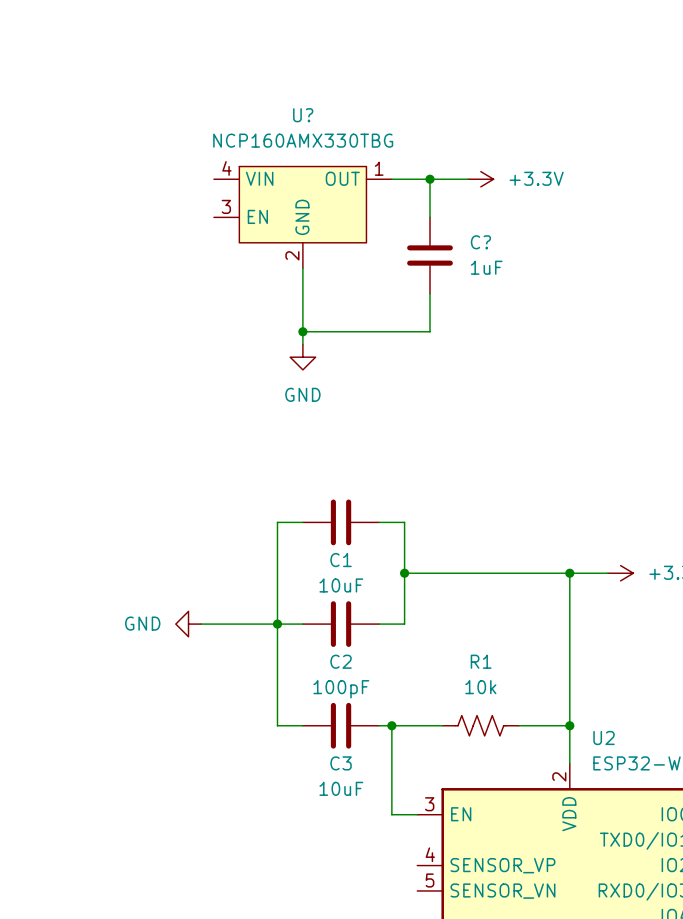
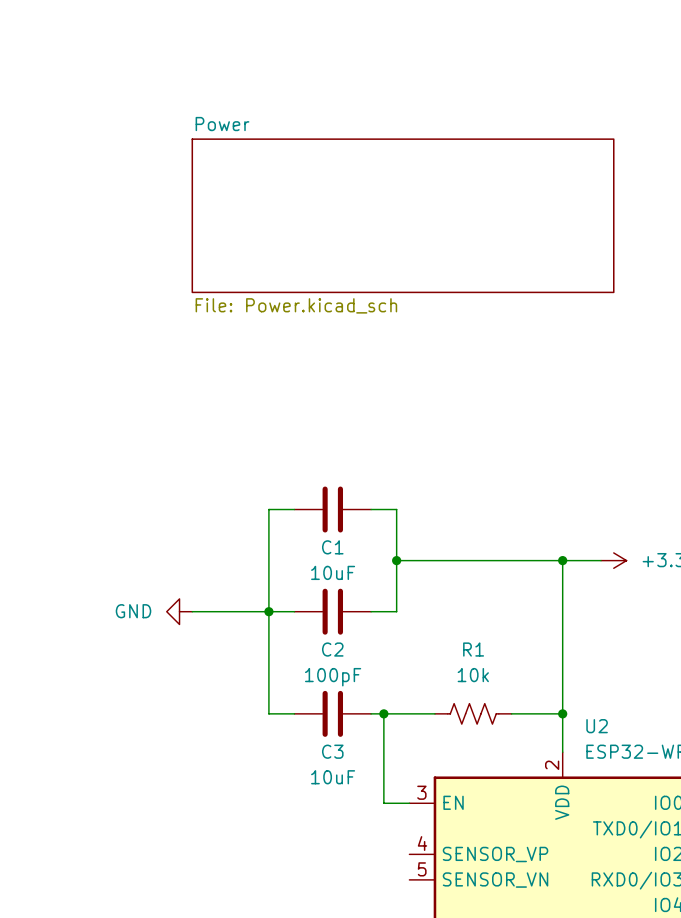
wire: (391, 179) (468, 179) -> none
wire: (430, 179) (430, 217) -> none
junction: (430, 179) -> none
power symbol: +3.3V (480, 179) -> none
U?: NCP160AMX330TBG (302, 217) -> none
sheet Power: none -> File: Power.kicad_sch (403, 215)
C?: 1uF (430, 255) -> none
wire: (302, 268) (302, 344) -> none
wire: (430, 293) (430, 331) (302, 331) -> none
junction: (302, 331) -> none
power symbol: GND (302, 357) -> none

